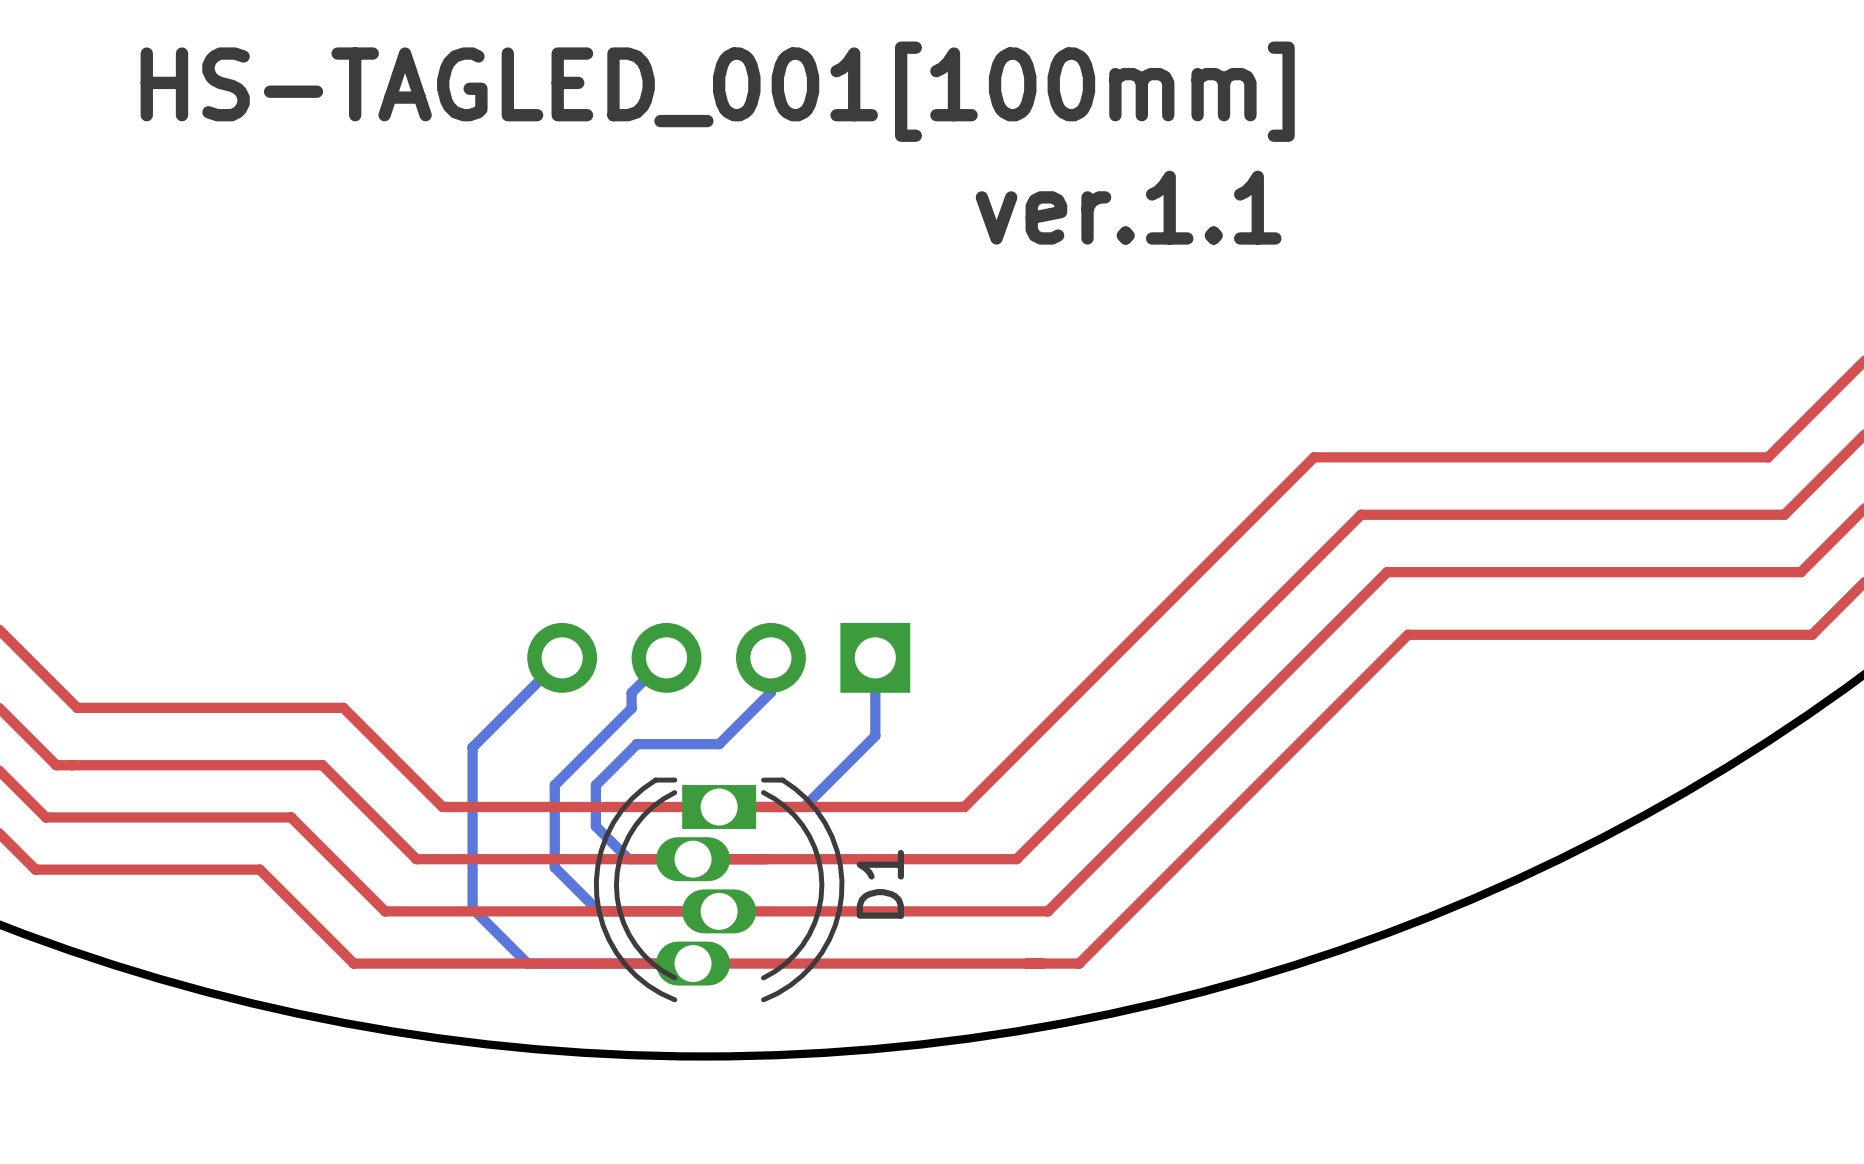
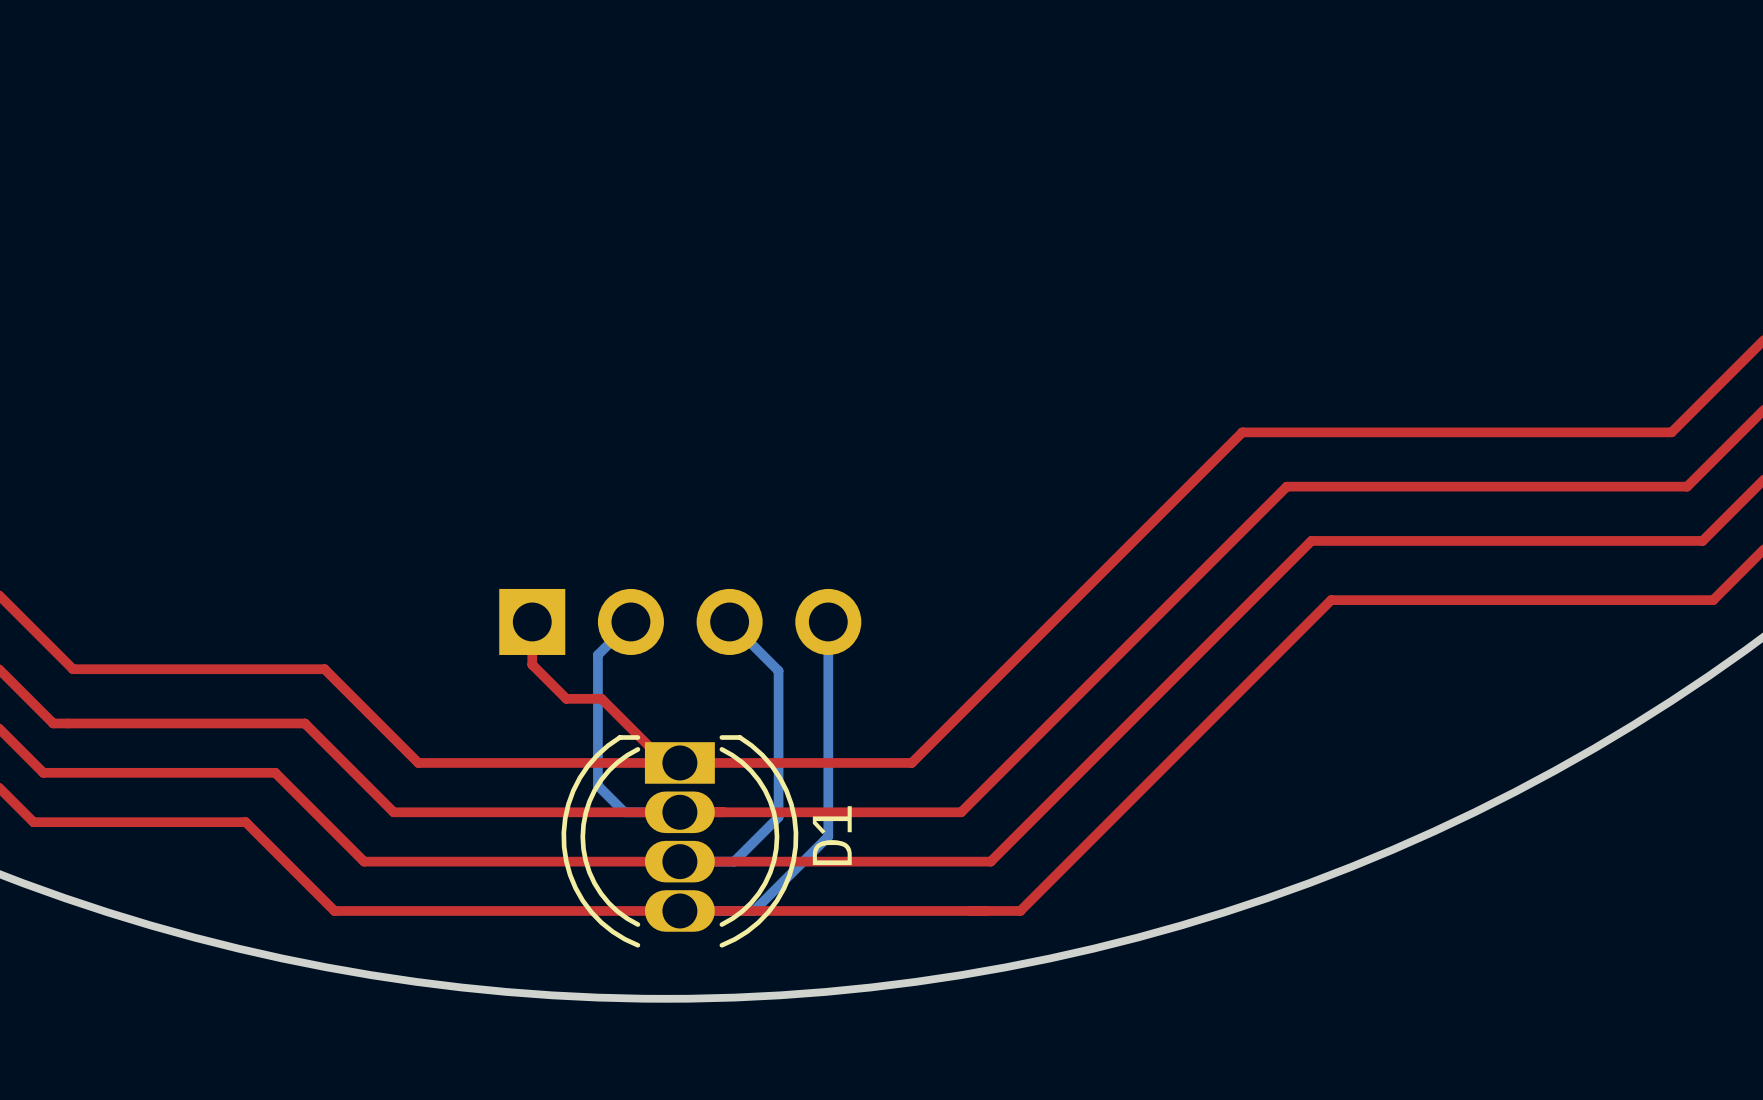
text: HS-TAGLED_001[100mm] (717, 91) -> none
text: ver.1.1 (1128, 207) -> none
bottom track: (562, 657) (472, 747) (472, 908) (527, 963) (693, 963) -> none
top track: none -> (532, 621) (532, 664) (566, 698) (601, 698) (665, 762)
bottom track: (666, 657) (631, 692) (631, 708) (554, 785) (554, 867) (598, 911) (719, 911) -> (630, 621) (597, 654) (597, 785) (624, 812)
part rotation: 0° (718, 657) -> 180° (680, 621)
bottom track: (770, 657) (770, 692) (719, 744) (636, 744) (595, 785) (595, 826) (628, 859) (660, 859) -> (729, 621) (778, 670) (778, 817) (734, 861) (679, 861)
bottom track: (875, 657) (875, 735) (804, 807) (719, 807) -> (828, 621) (828, 836) (753, 910) (679, 910)
D1 footprint: [593, 777, 845, 1003] -> [561, 735, 799, 948]

